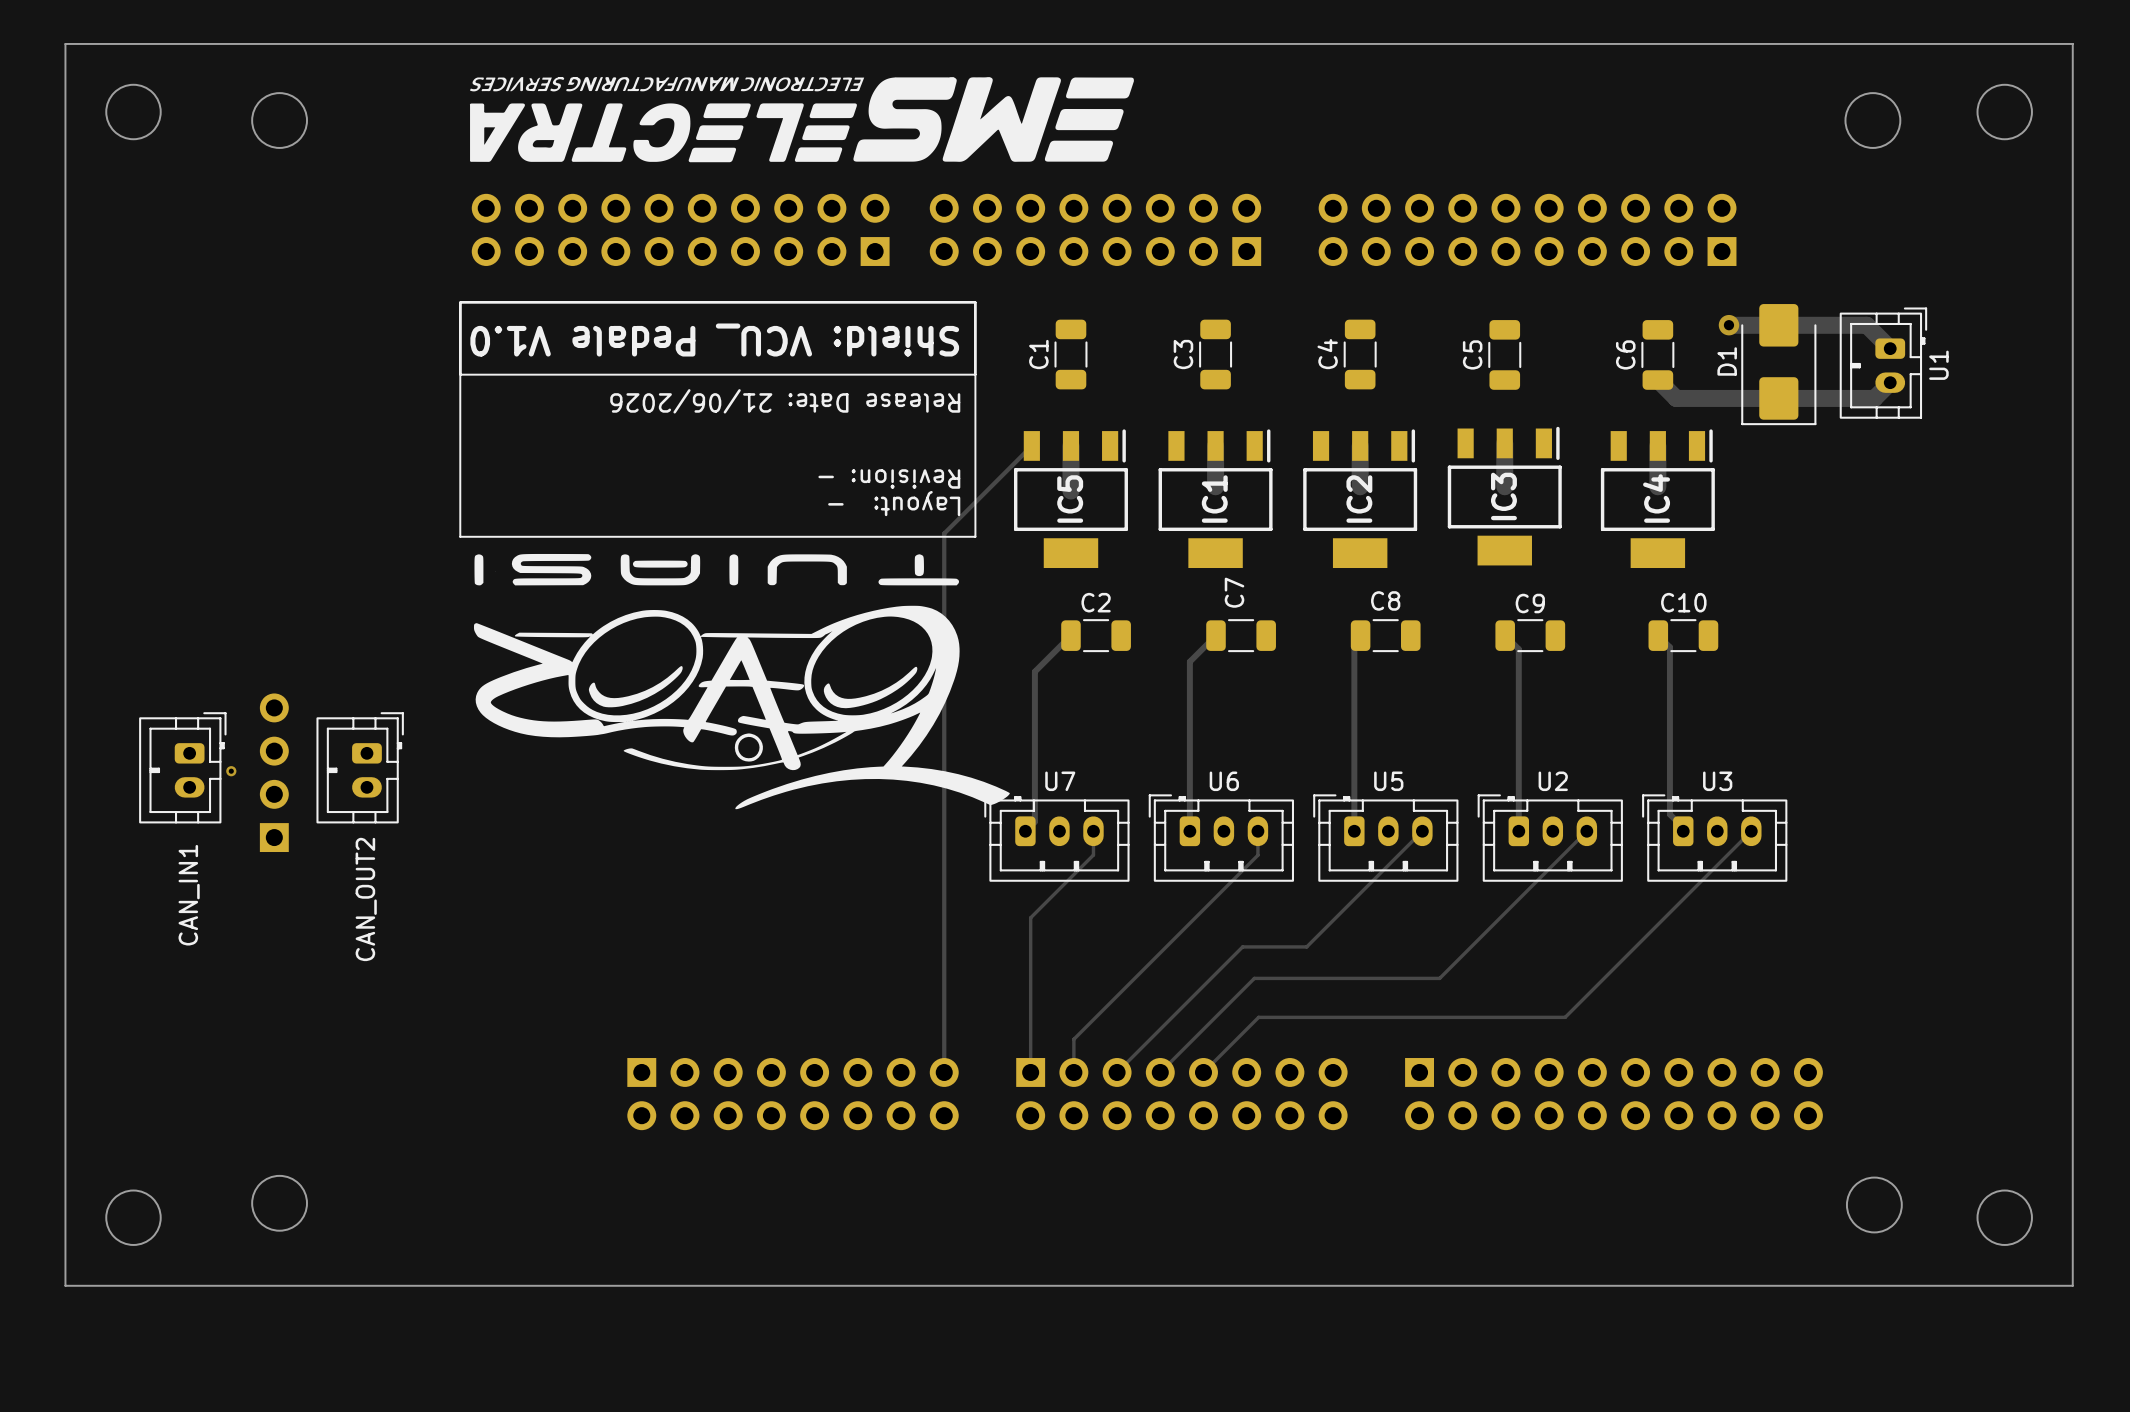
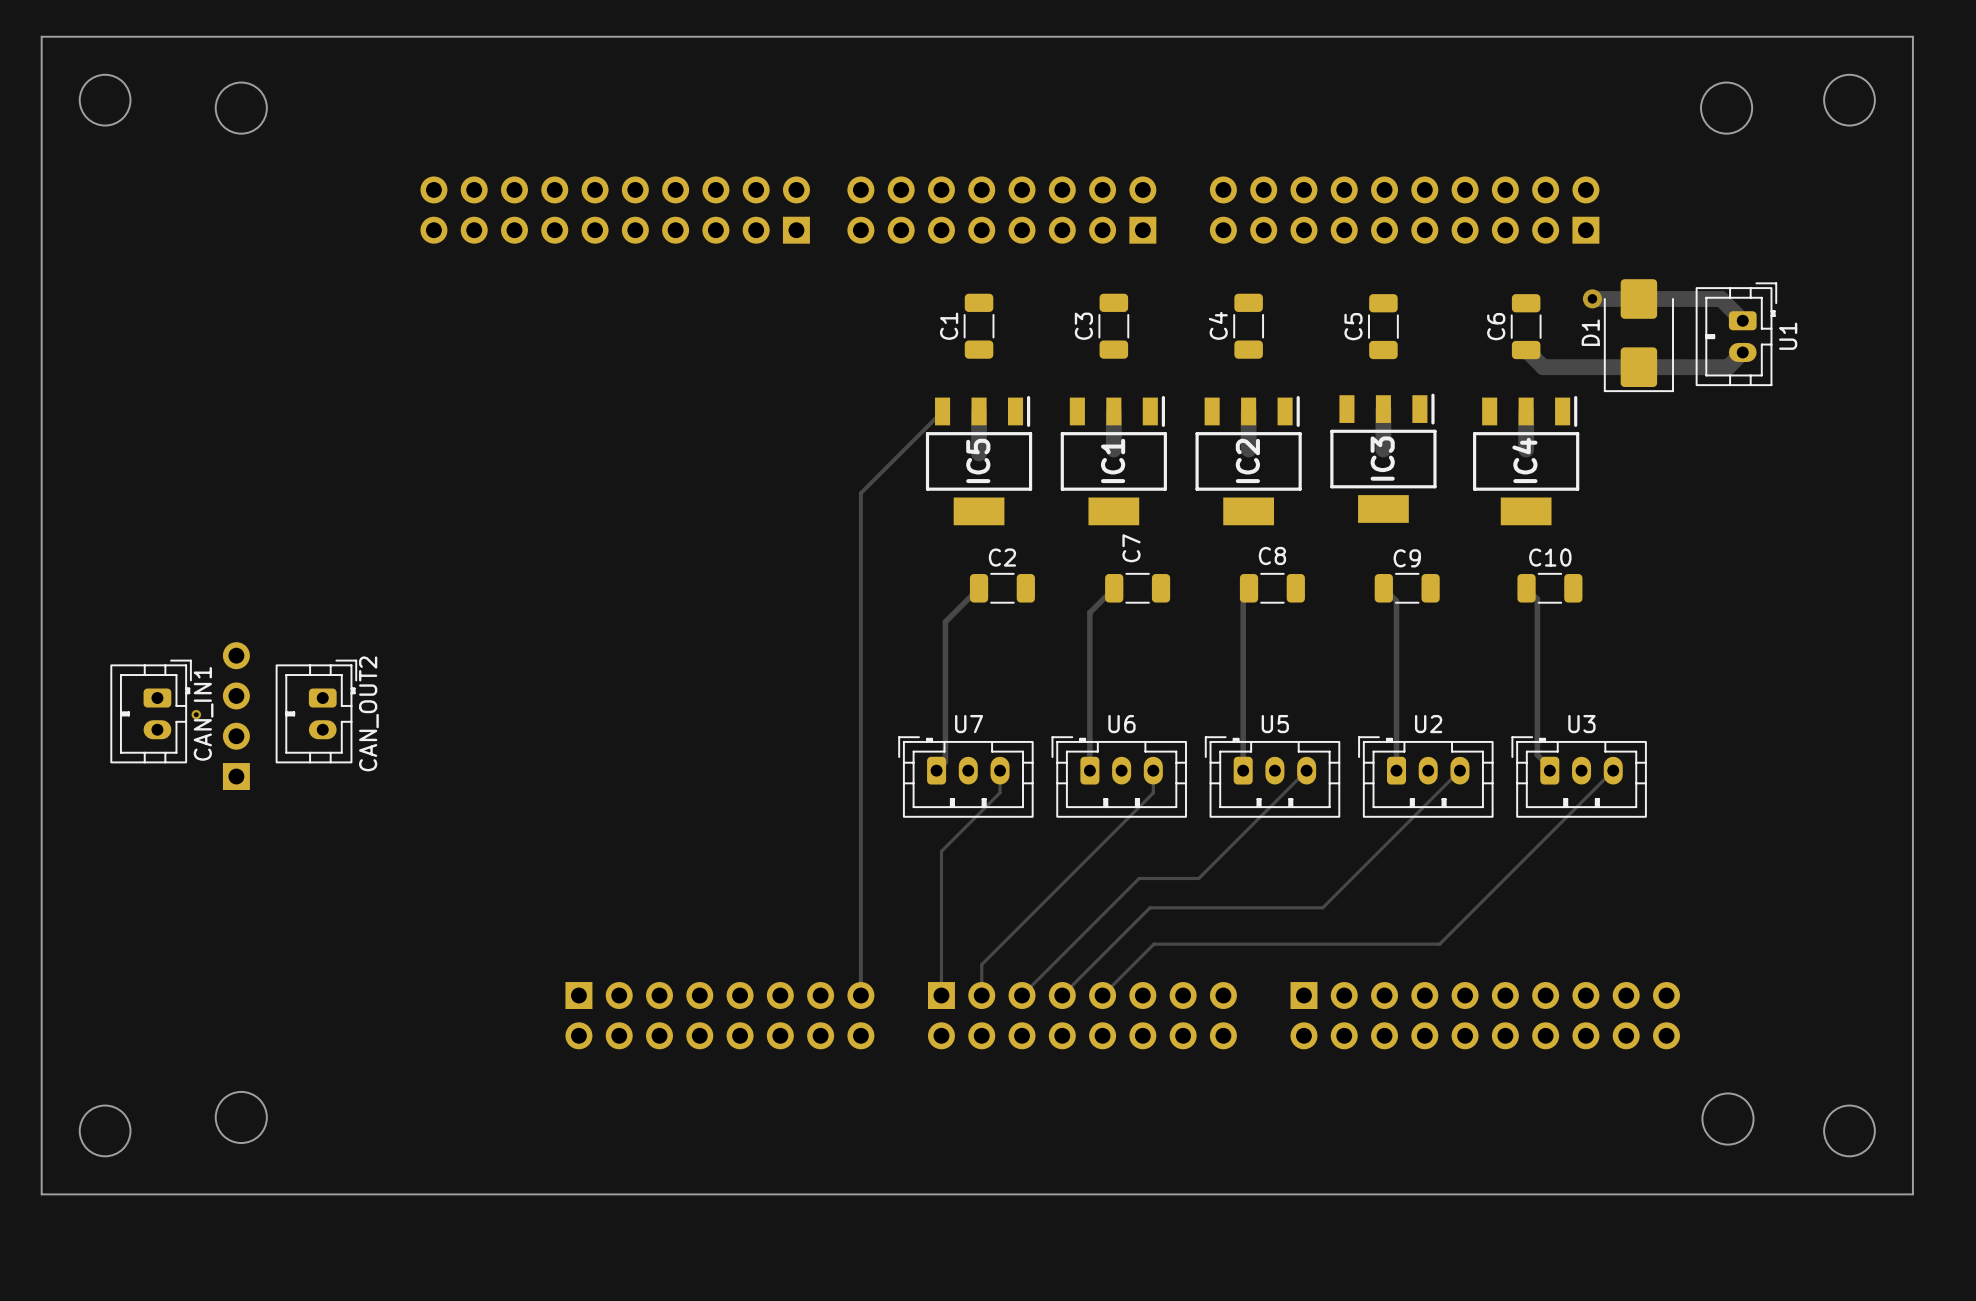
drawing: [469, 77, 1134, 163] -> none
line: (460, 302) (460, 374) (975, 374) -> none
line: (460, 302) (460, 536) (975, 536) (975, 302) (460, 302) -> none
text: Shield: VCU_ Pedale V1.0 (714, 340) -> none
text: Release Date: 21/06/2026 (785, 401) -> none
text: Revision: - (889, 478) -> none
text: Layout: - (894, 503) -> none
drawing: [473, 553, 1010, 810] -> none
CAN_IN1 name position: CAN_IN1 (189, 895) -> CAN_IN1 (203, 713)
CAN_OUT2 name position: CAN_OUT2 (366, 899) -> CAN_OUT2 (368, 713)

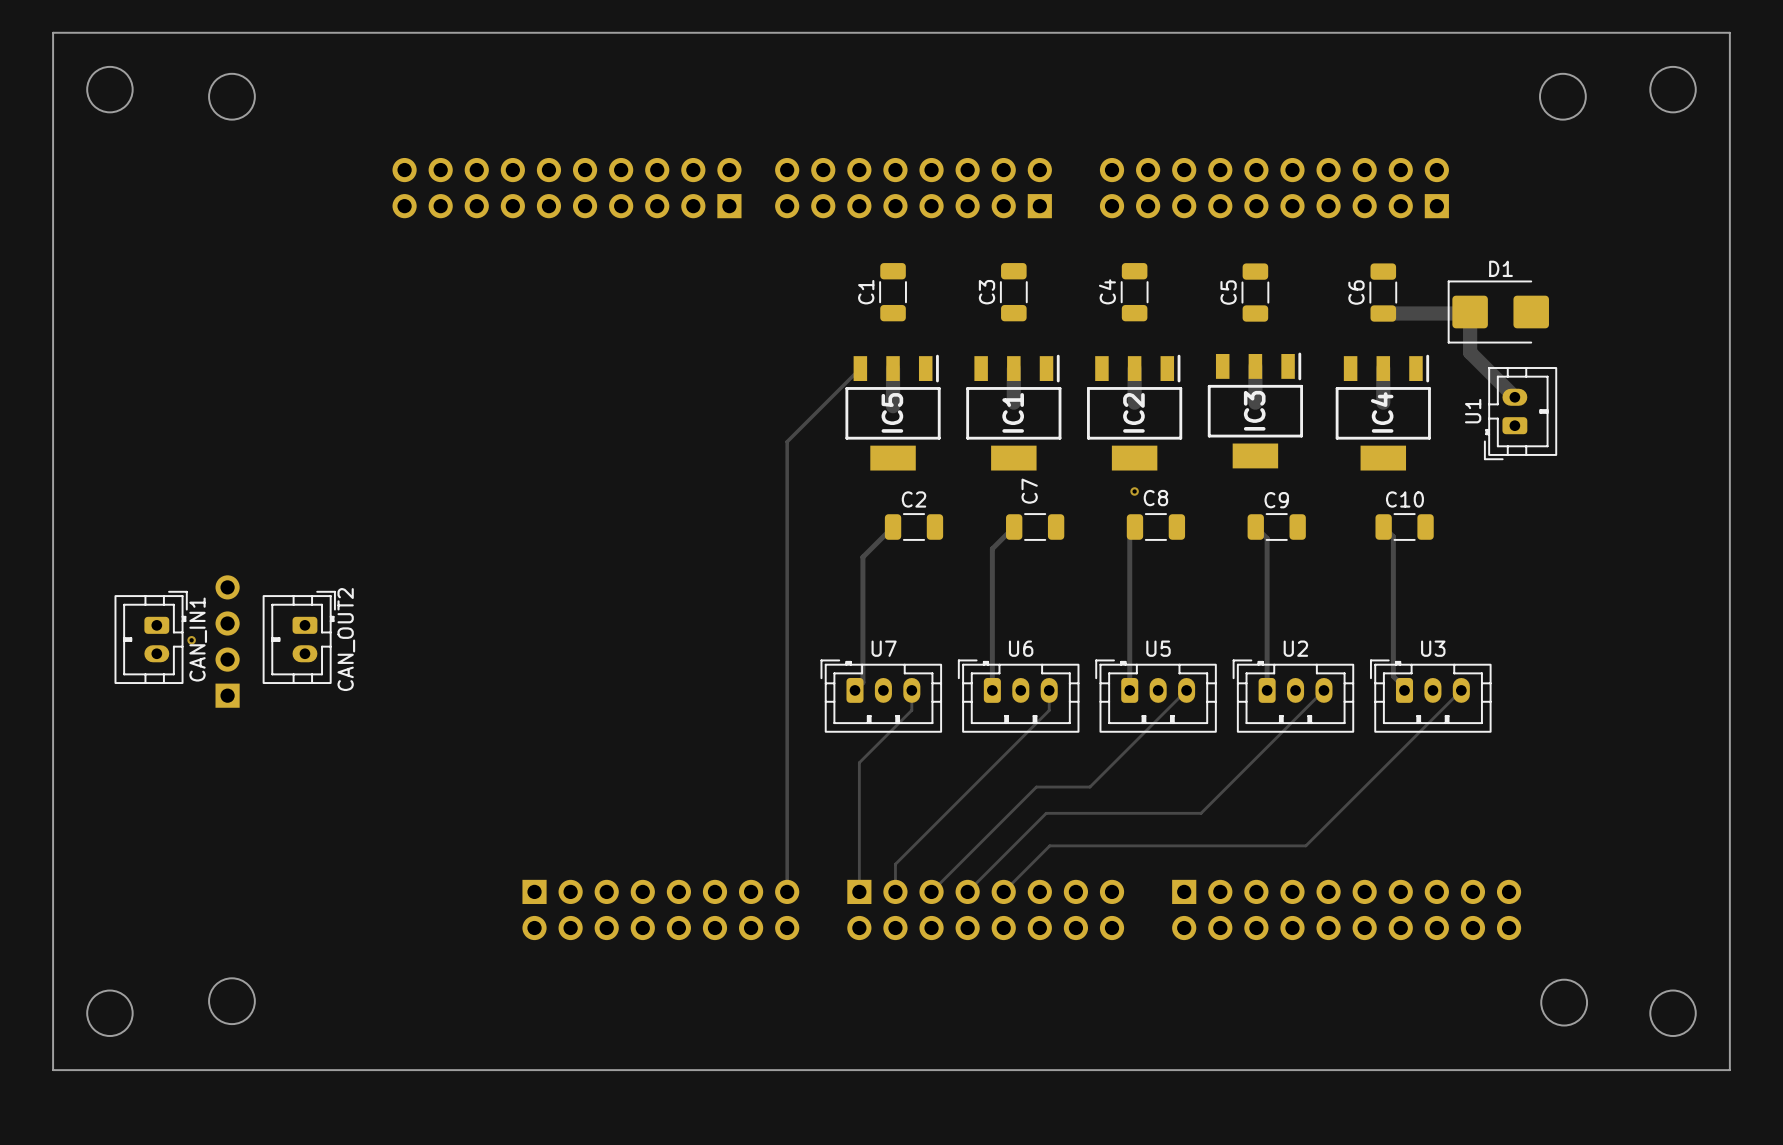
track: (1592, 298) (1721, 298) (1742, 320) -> none
via: (1592, 298) -> none
U1 rotation: 0° (1736, 334) -> 180° (1520, 413)
U1 position: (1736, 334) -> (1520, 413)
D1 rotation: 0° (1638, 335) -> 90° clockwise (1498, 312)
track: (1526, 350) (1543, 367) (1728, 367) (1742, 352) -> (1383, 313) (1470, 312) (1470, 352) (1514, 397)
via: none -> (1134, 491)

